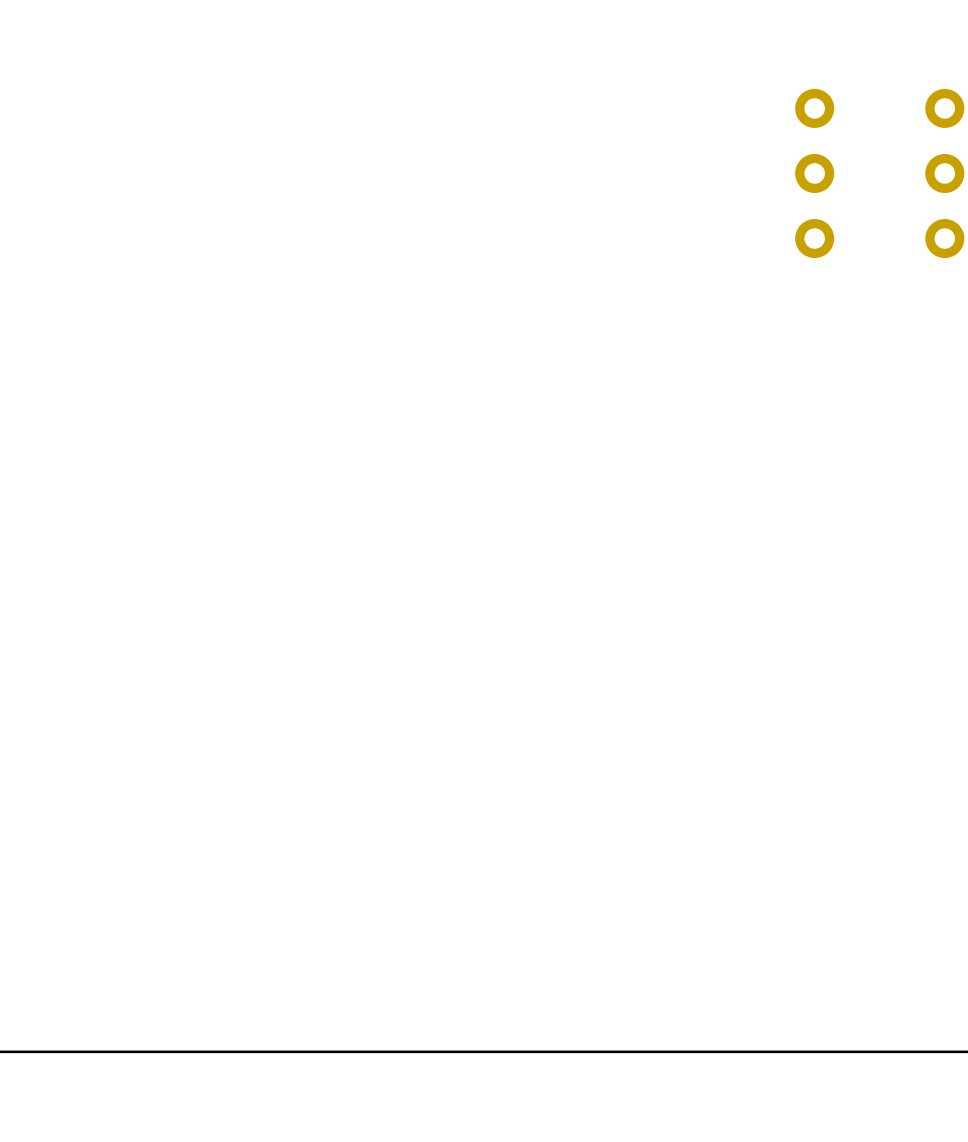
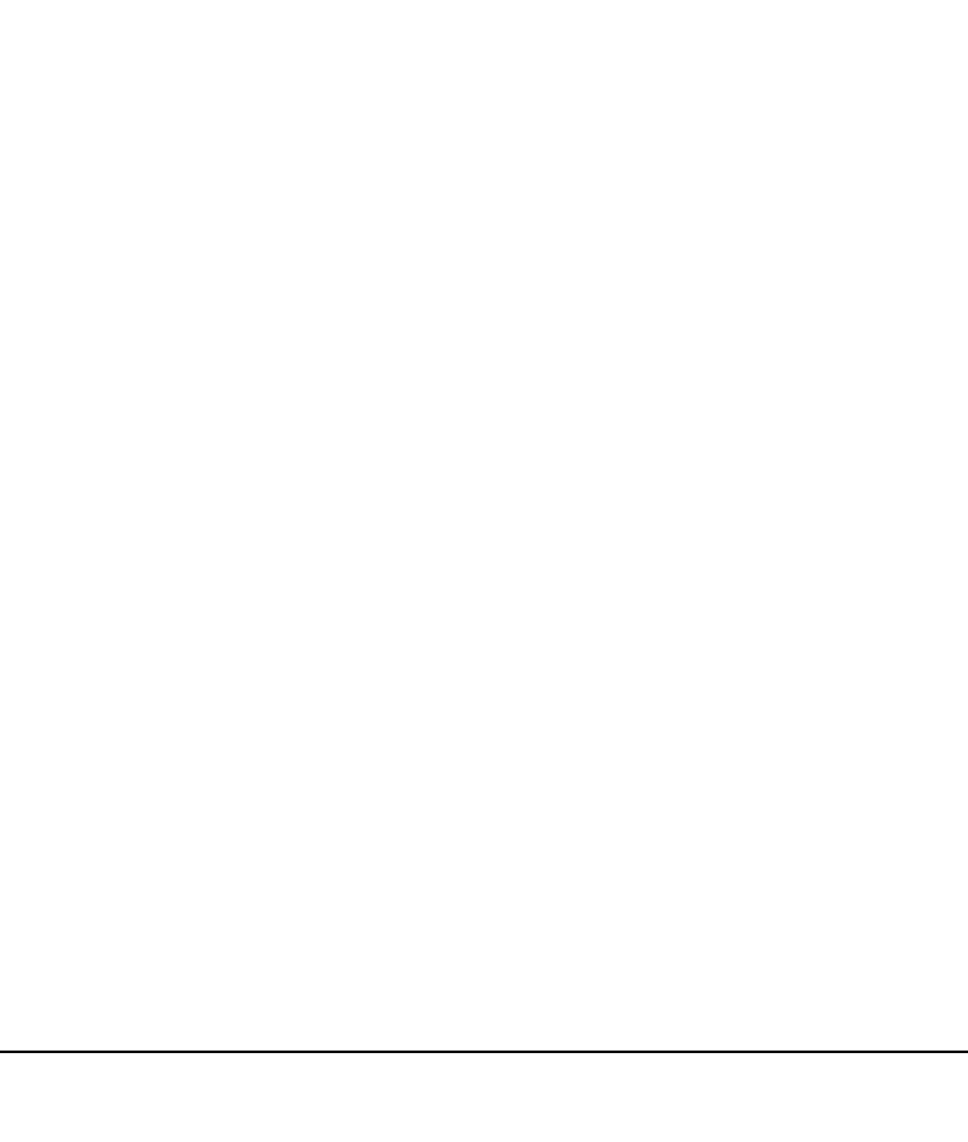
part: (814, 173) -> none
part: (944, 173) -> none

